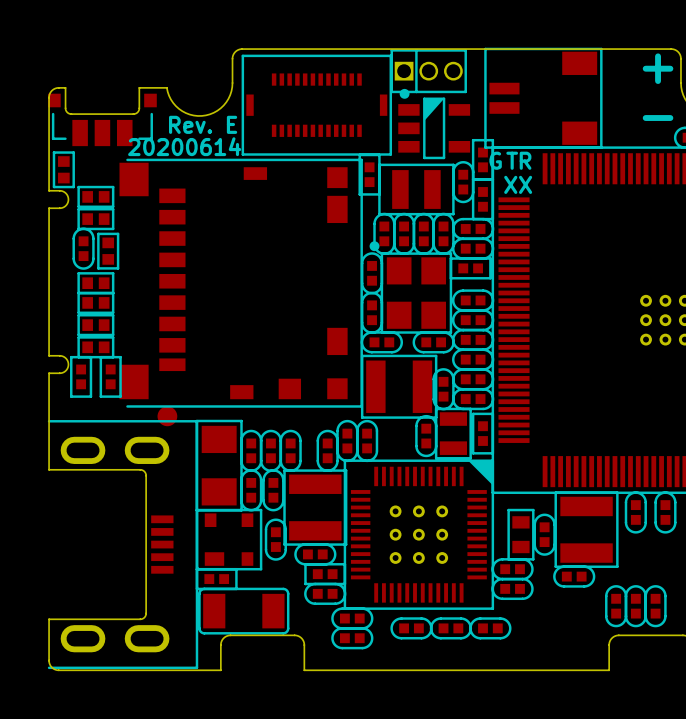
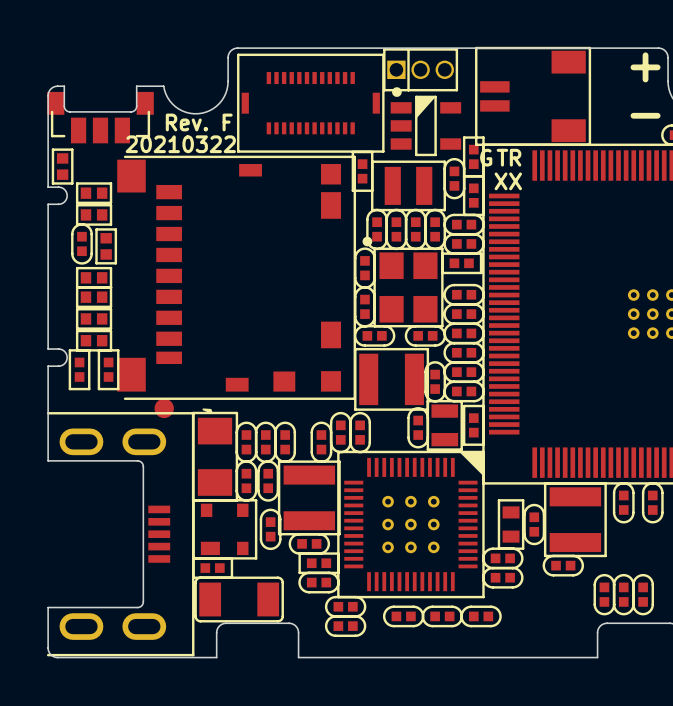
part footprint: [48, 93, 157, 147] -> [47, 91, 154, 144]
text: E (232, 124) -> F (227, 122)
text: 20200614 (184, 146) -> 20210322 (180, 144)
drawing: none -> [202, 408, 213, 414]

